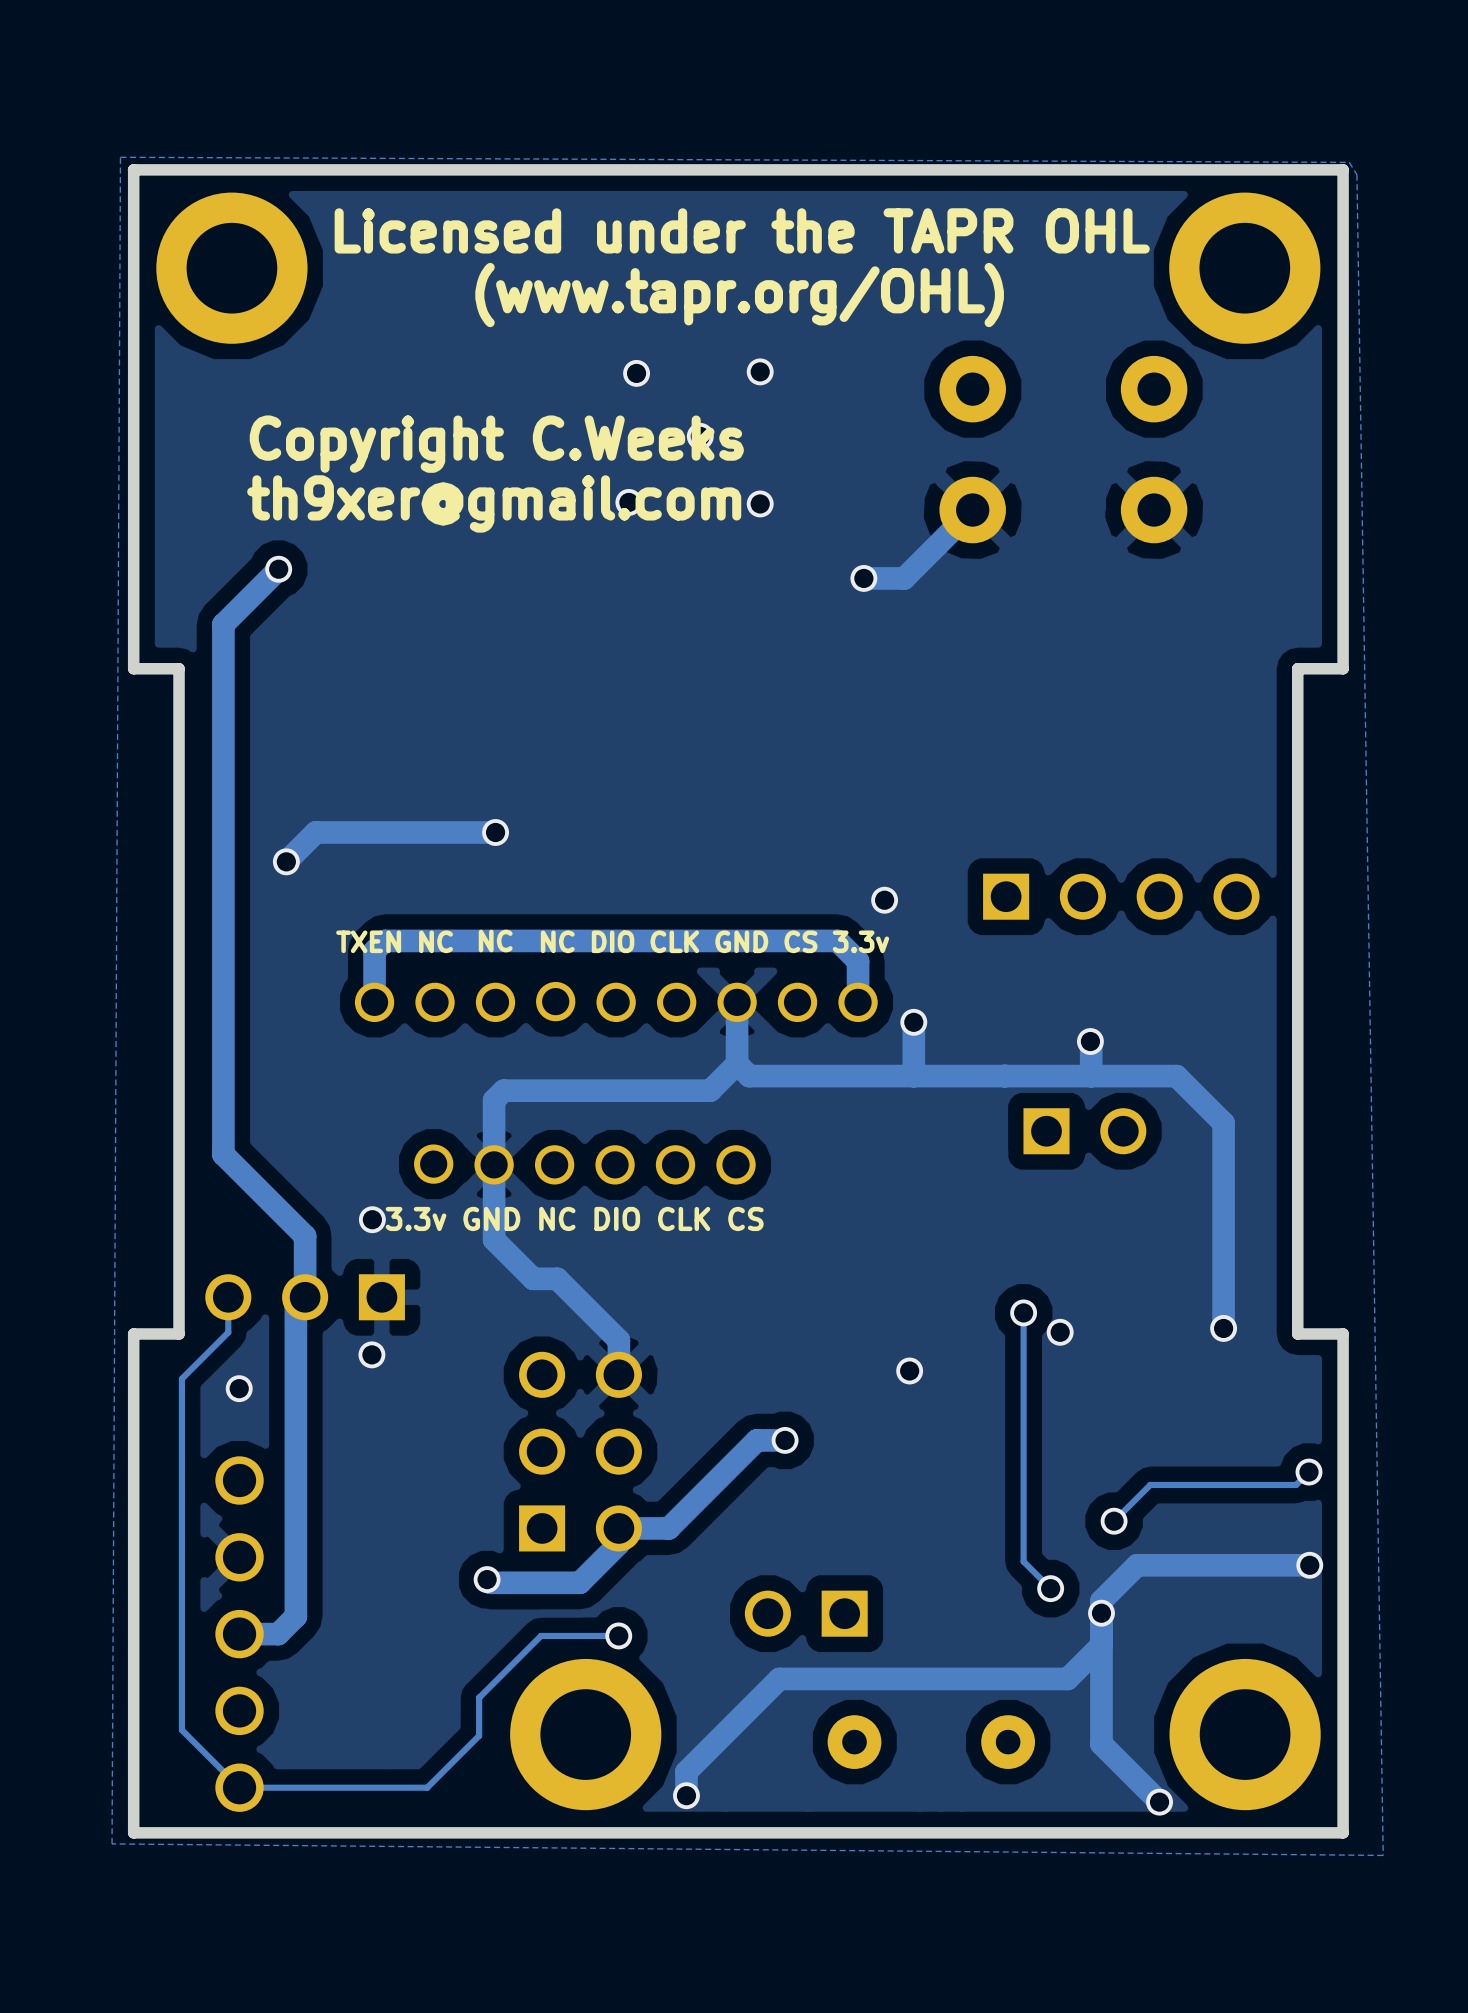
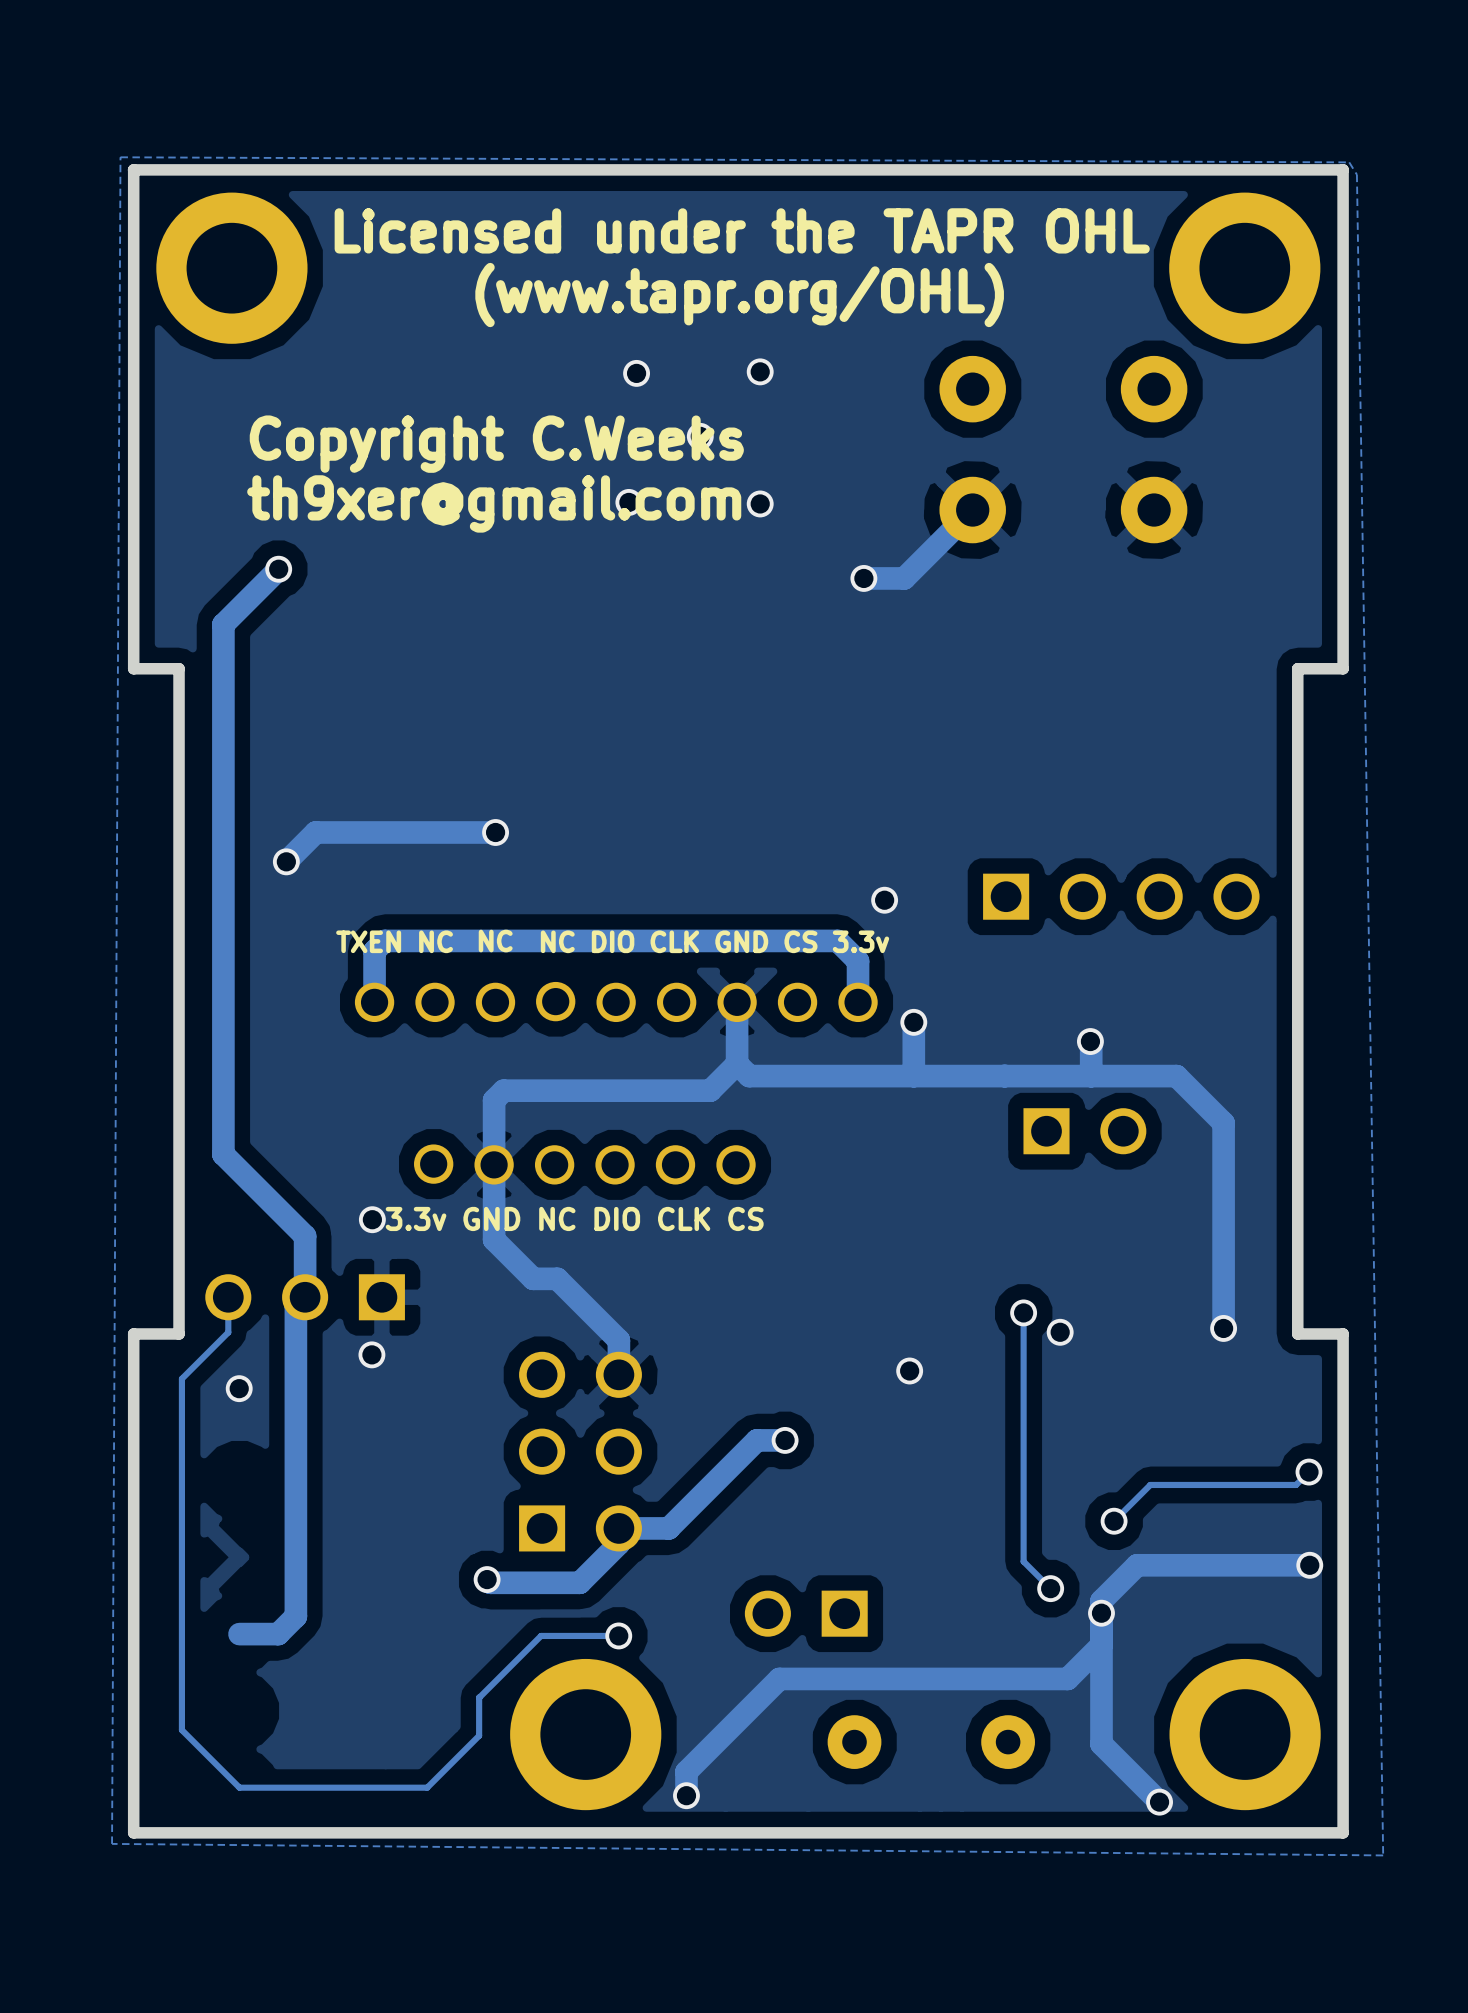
part: (239, 1634) -> none

